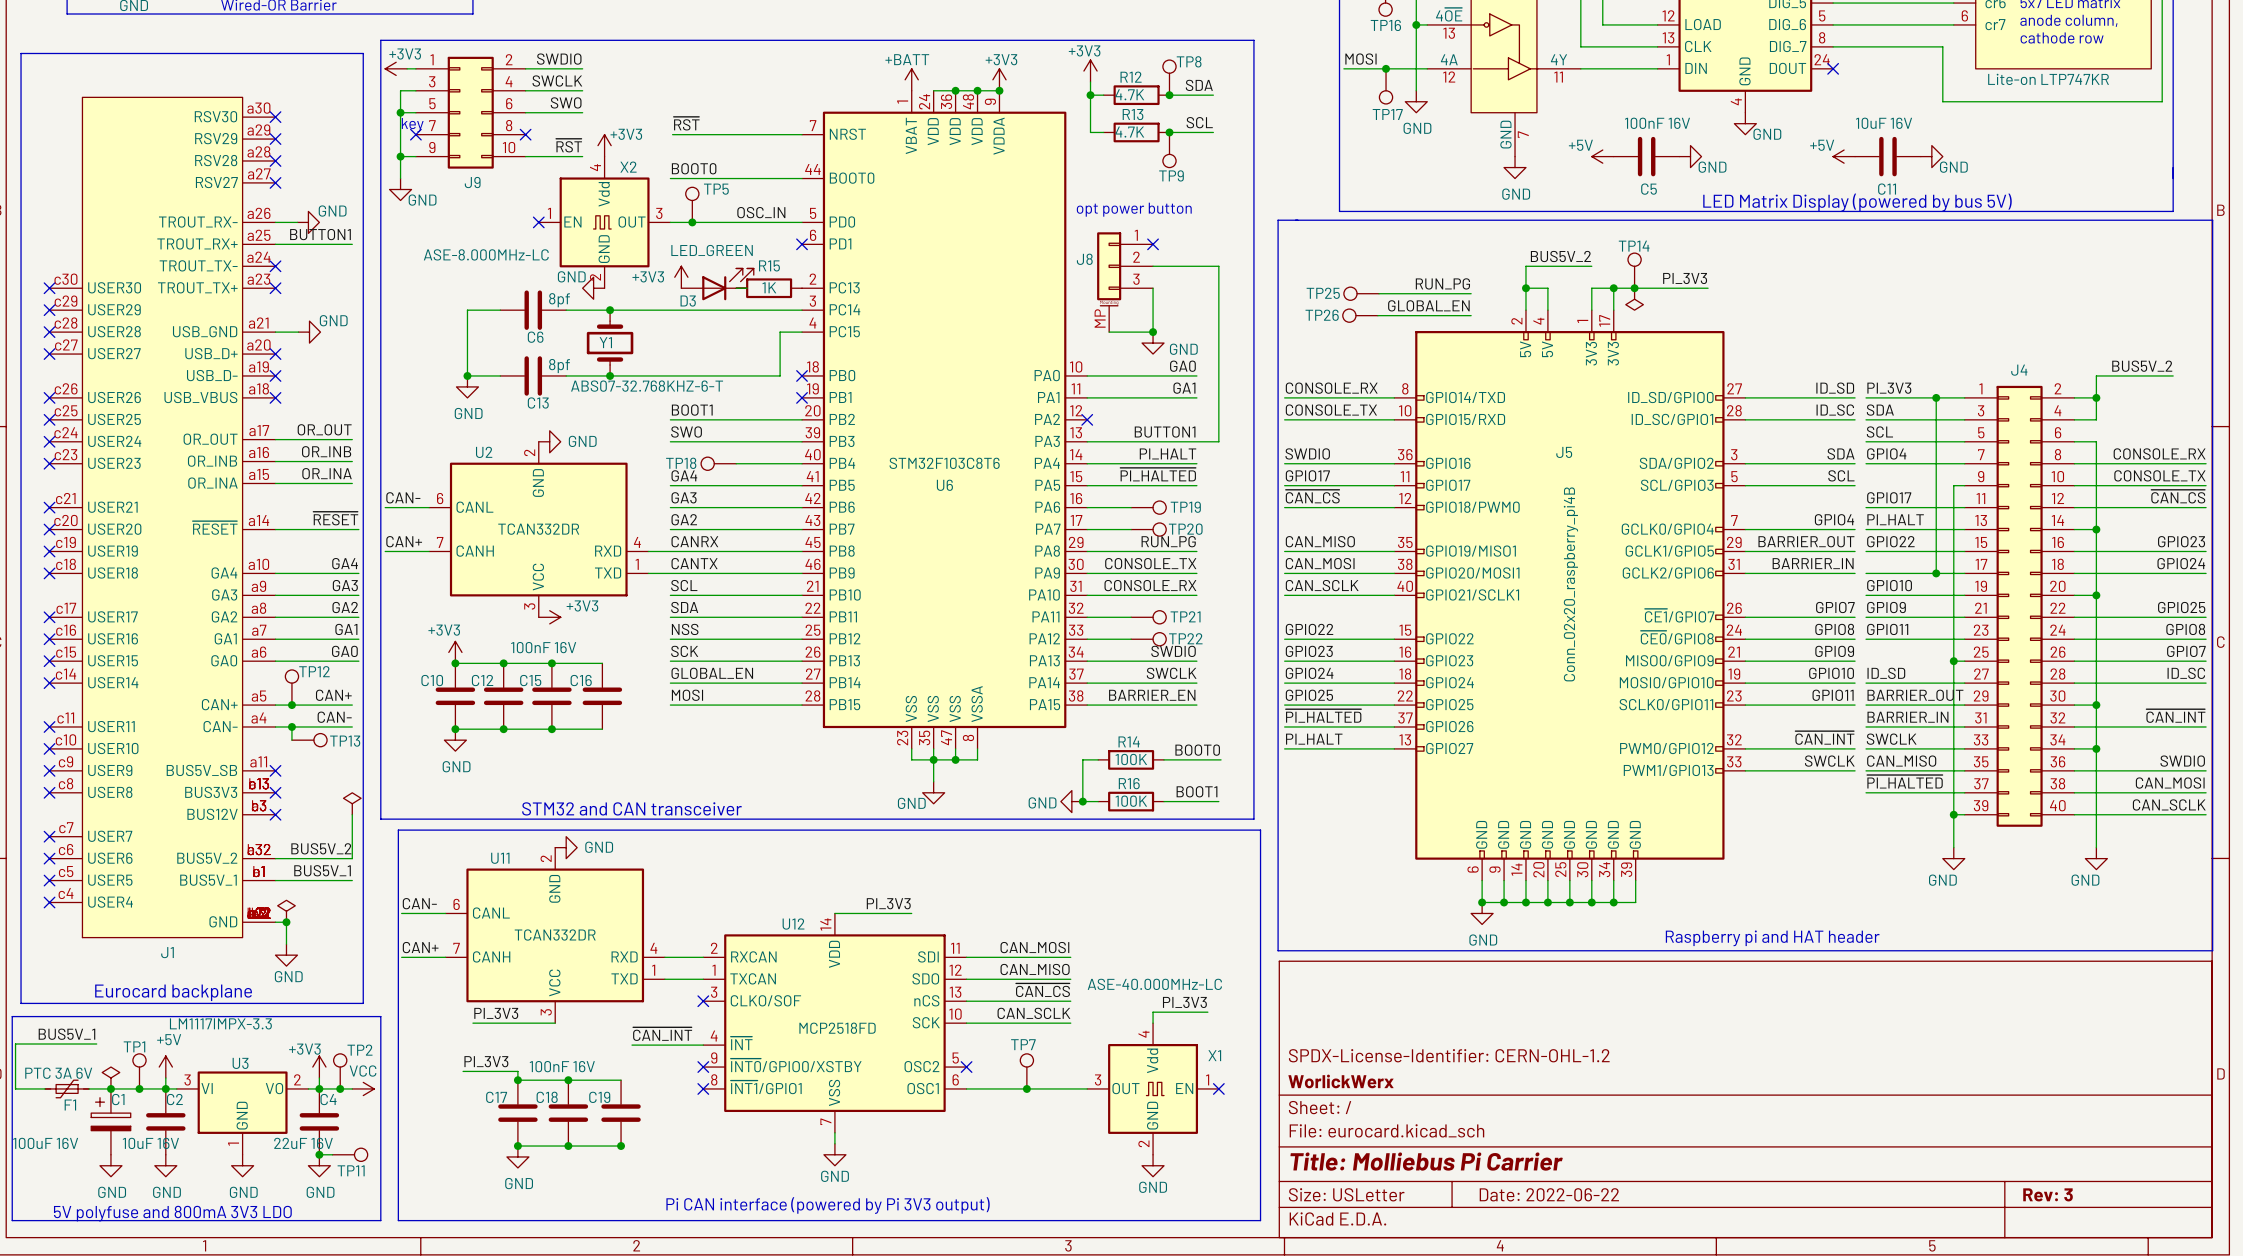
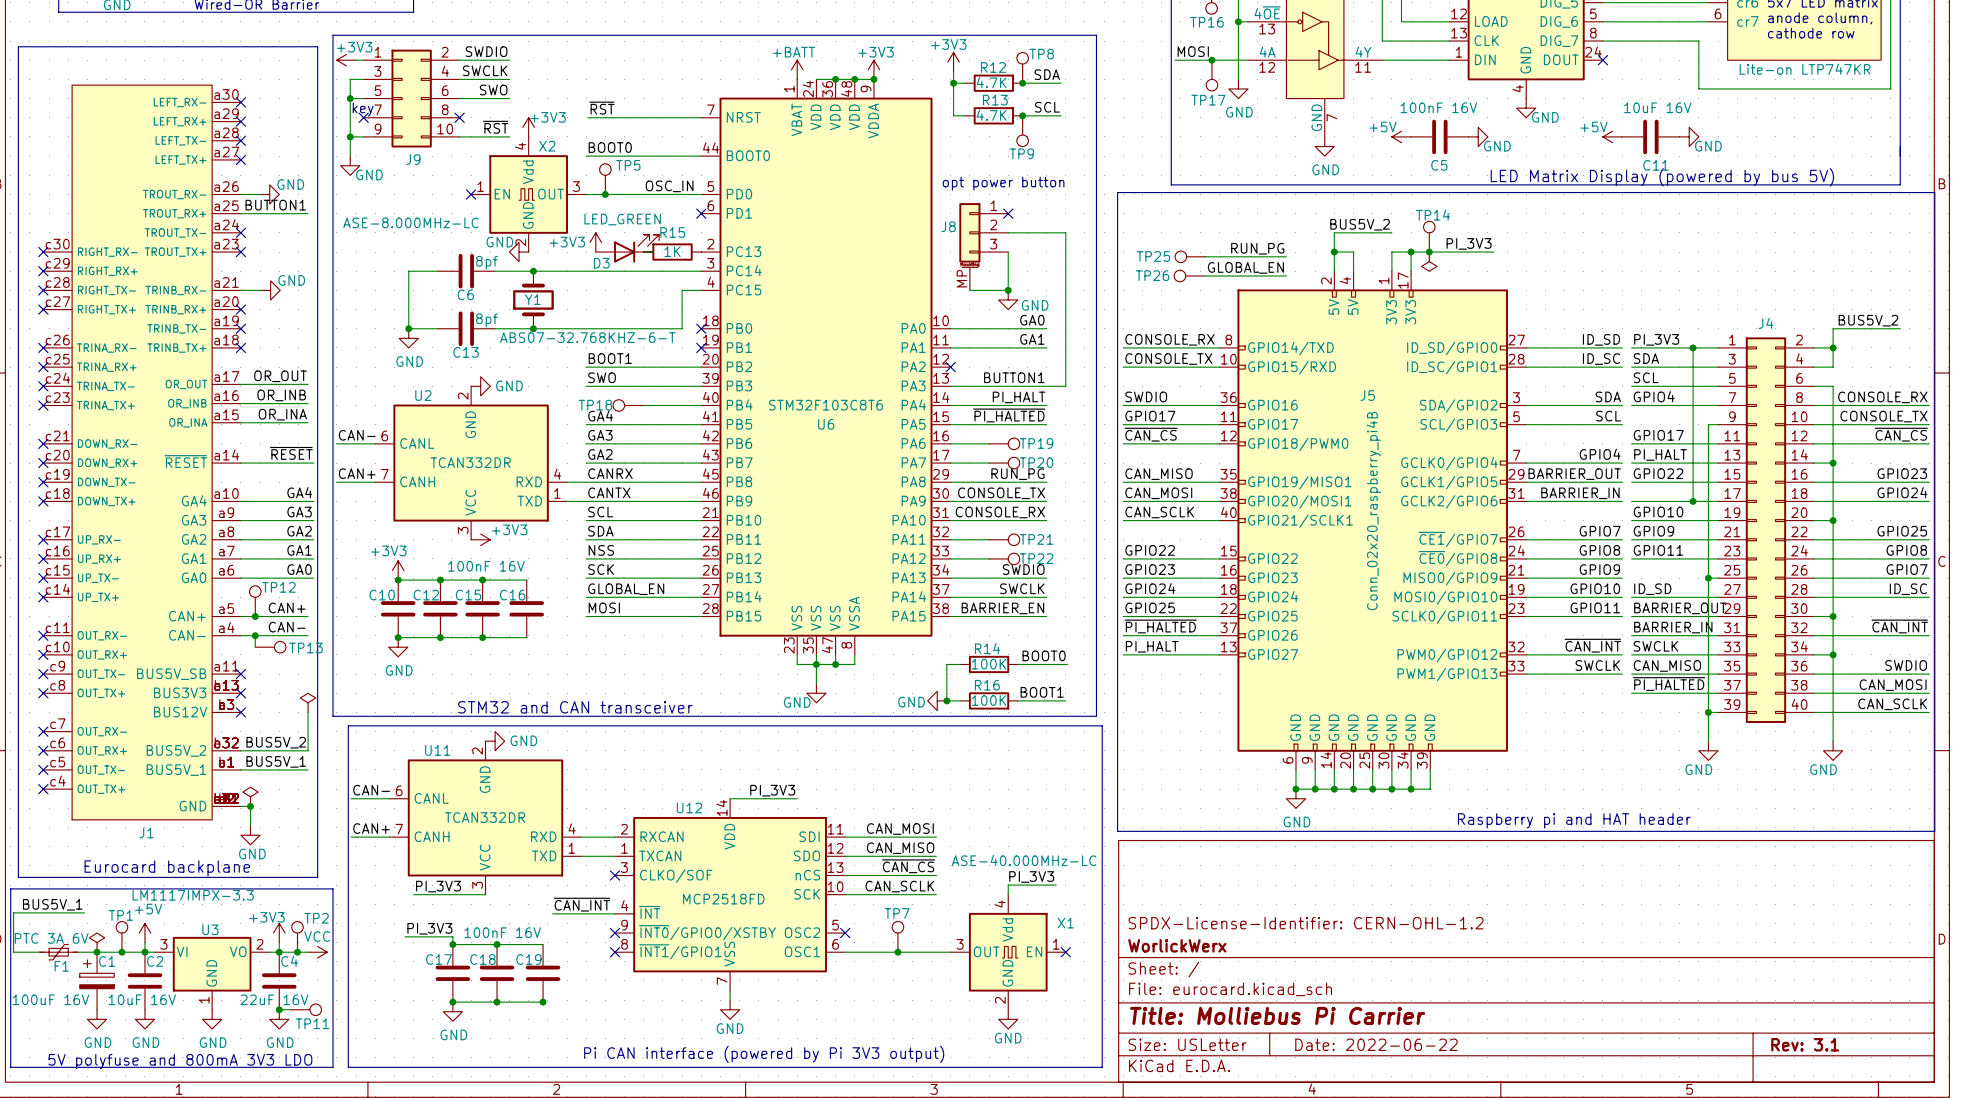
J1 symbol: [49, 97, 276, 938] -> [43, 85, 241, 820]
title block: Rev: 3 (2048, 1194) -> Rev: 3.1 (1805, 1044)

